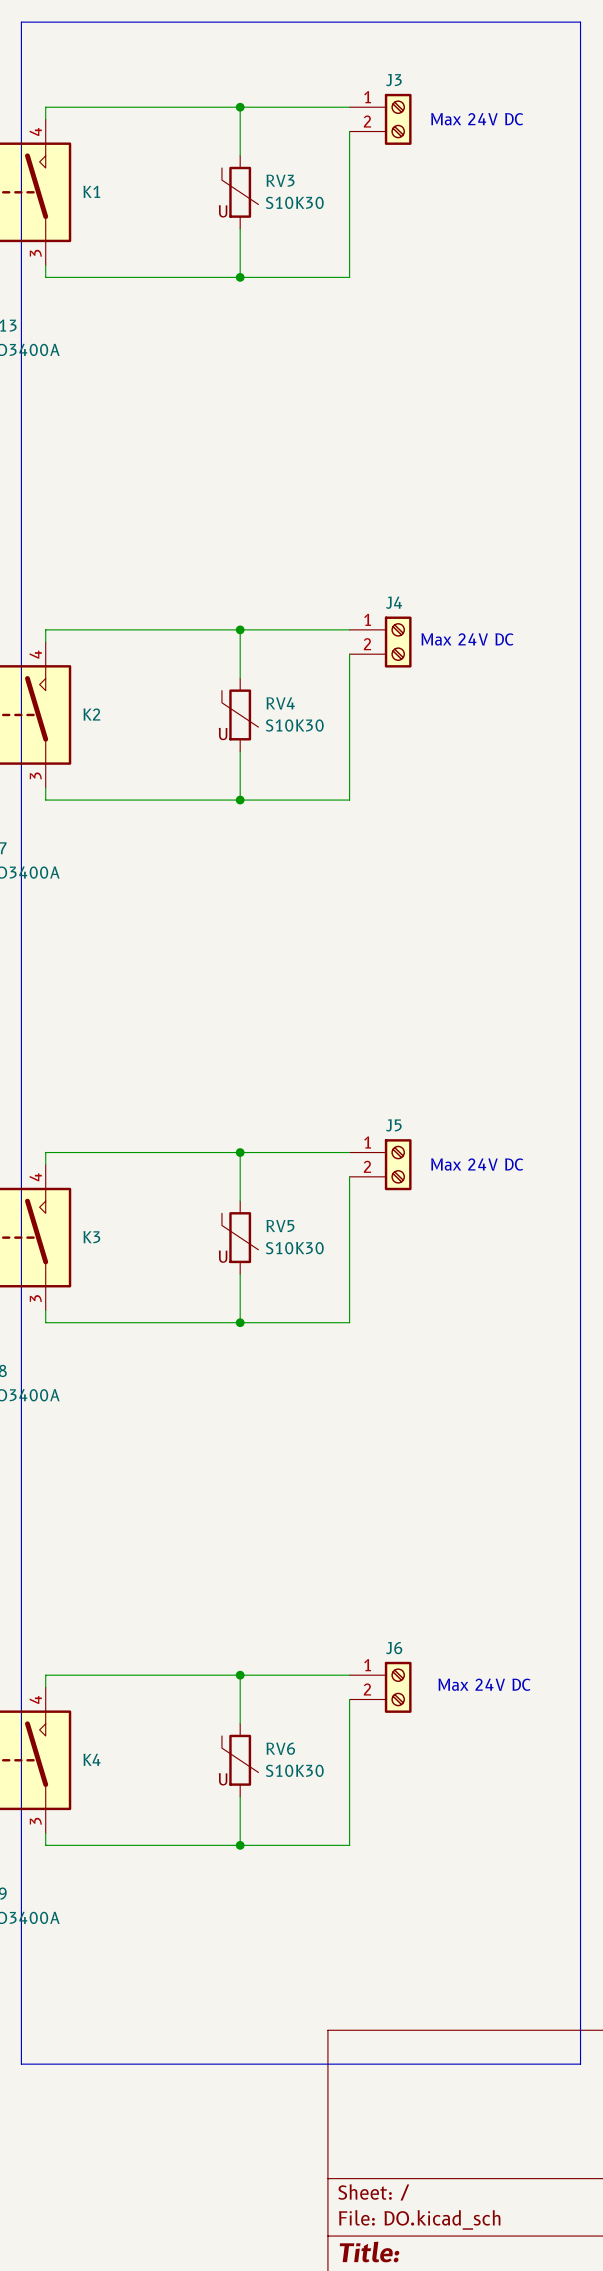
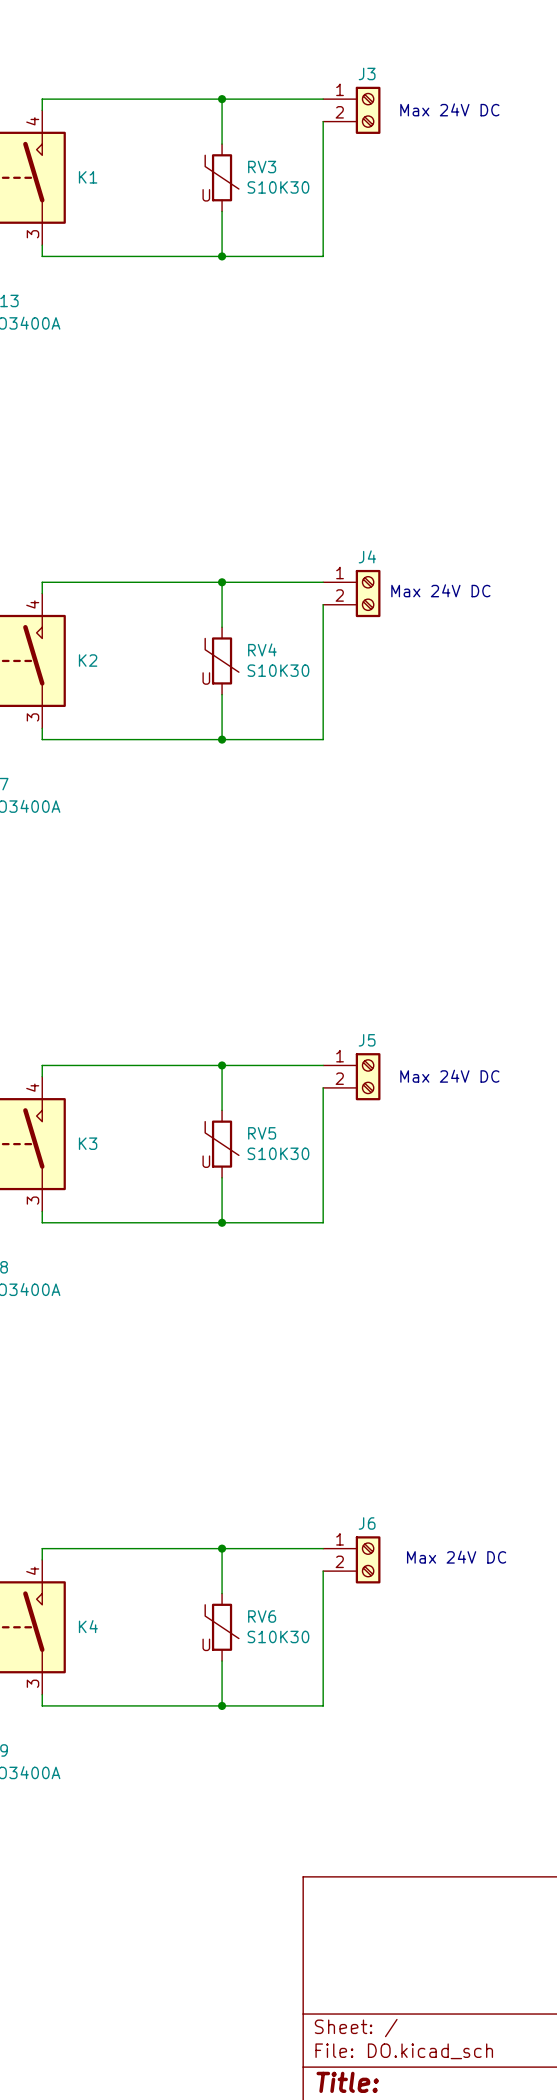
line: (21, 22) (580, 22) (580, 2064) (21, 2064) (21, 22) -> none

